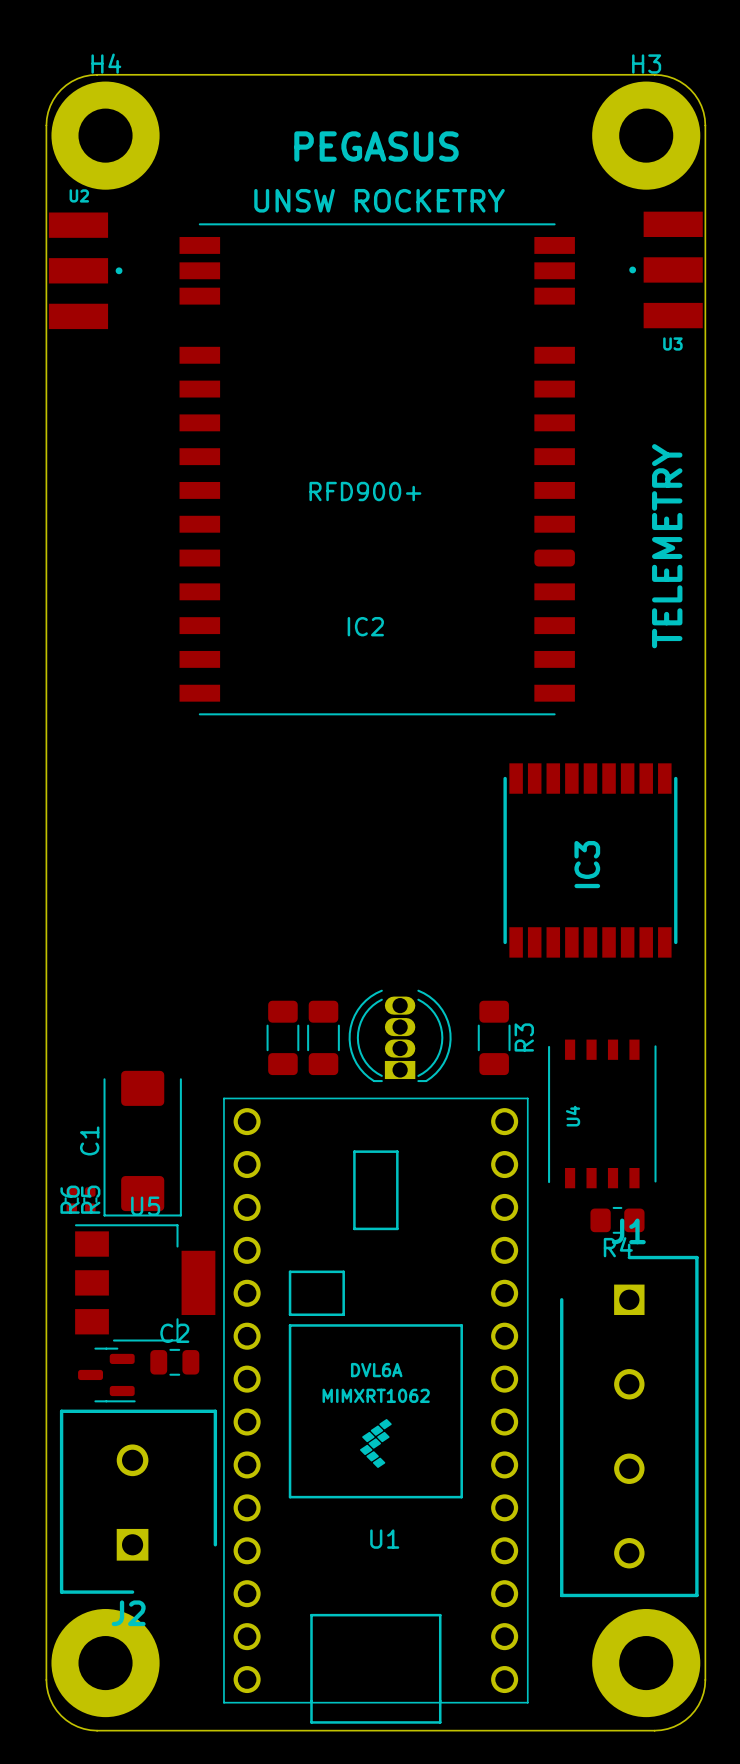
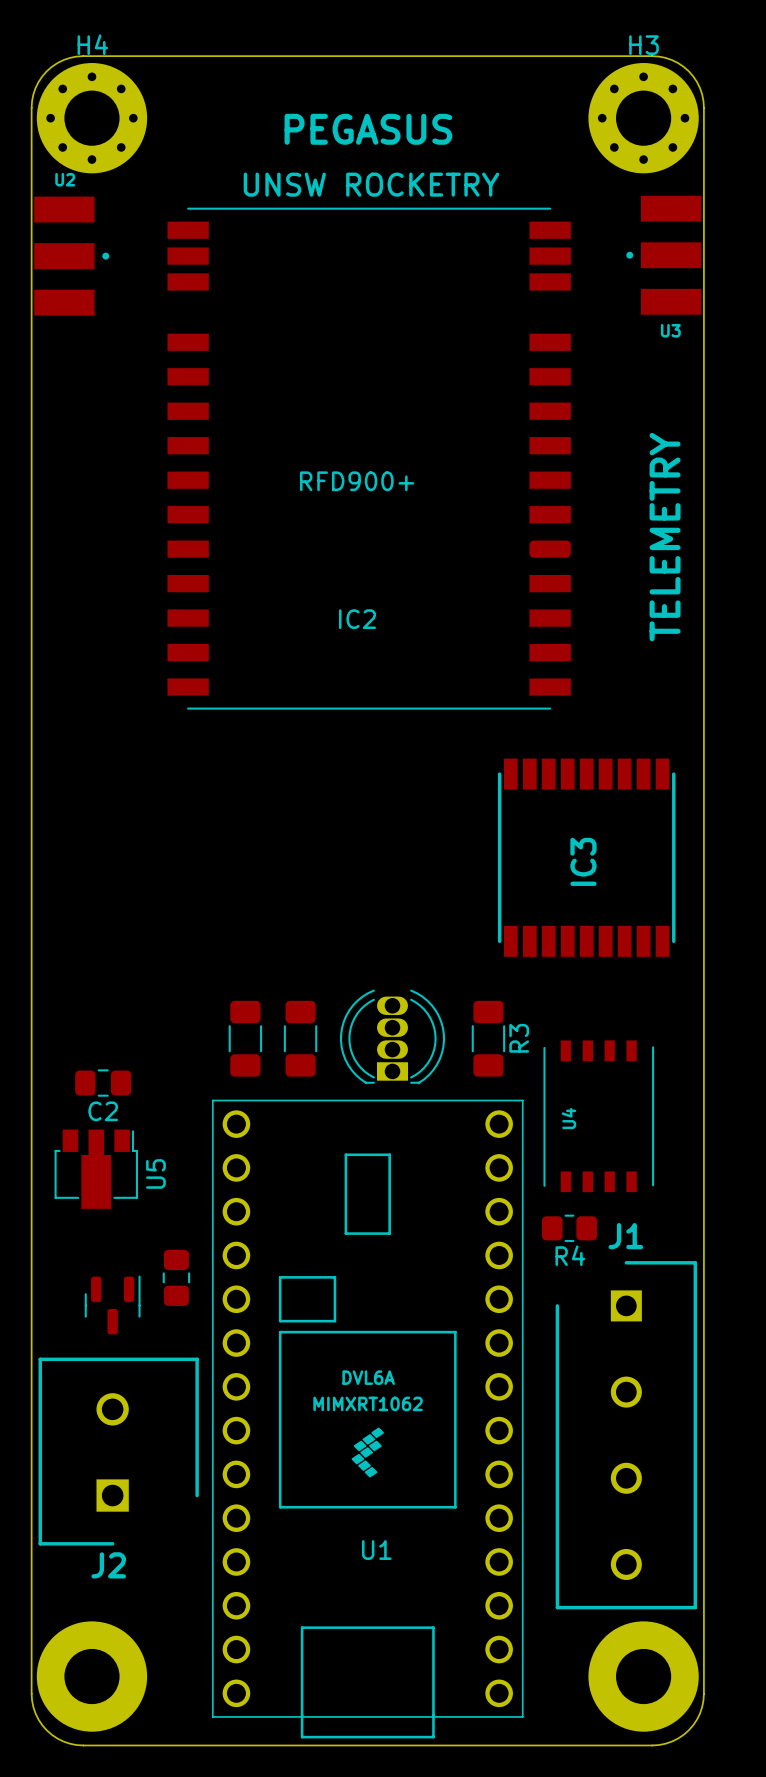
H4 footprint: [51, 81, 160, 190] -> [36, 63, 148, 174]
H3 footprint: [592, 81, 701, 190] -> [588, 63, 699, 174]
part: none -> (245, 1038)
part: (282, 1037) -> none
part: none -> (300, 1038)
part: (323, 1037) -> none
C1: (142, 1143) -> none
R5: (71, 1200) -> none
R6: (90, 1200) -> none
U5 name position: U5 (145, 1206) -> U5 (155, 1173)
R4 position: (617, 1220) -> (569, 1228)
U5 footprint: [74, 1224, 216, 1342] -> [54, 1129, 138, 1209]
part: none -> (176, 1277)
C2 name position: C2 (174, 1333) -> C2 (103, 1111)
C2 footprint: [150, 1348, 200, 1376] -> [75, 1069, 132, 1097]
part rotation: 0° (106, 1374) -> 90° counterclockwise (112, 1304)
part position: (106, 1374) -> (112, 1304)
J2 position: (138, 1501) -> (118, 1451)

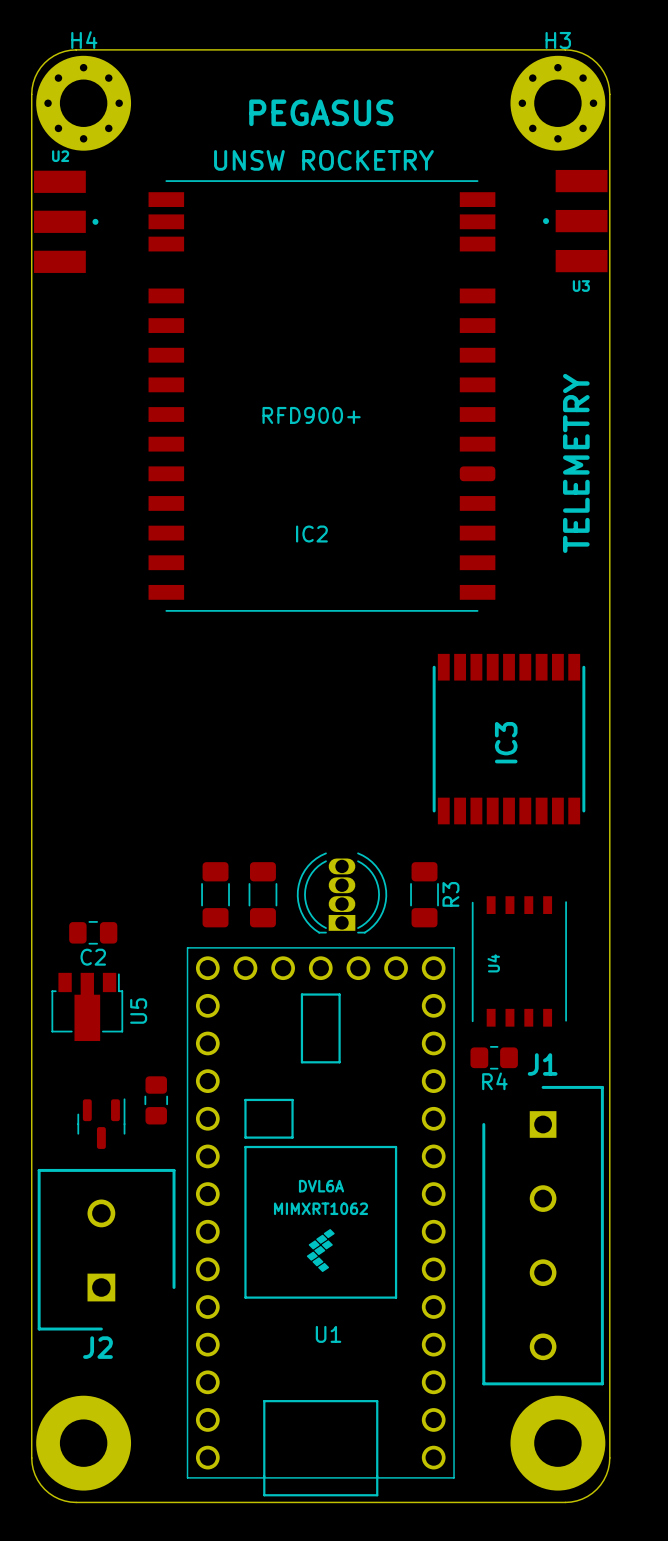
U1 footprint: [211, 1099, 524, 1739] -> [186, 947, 455, 1497]

